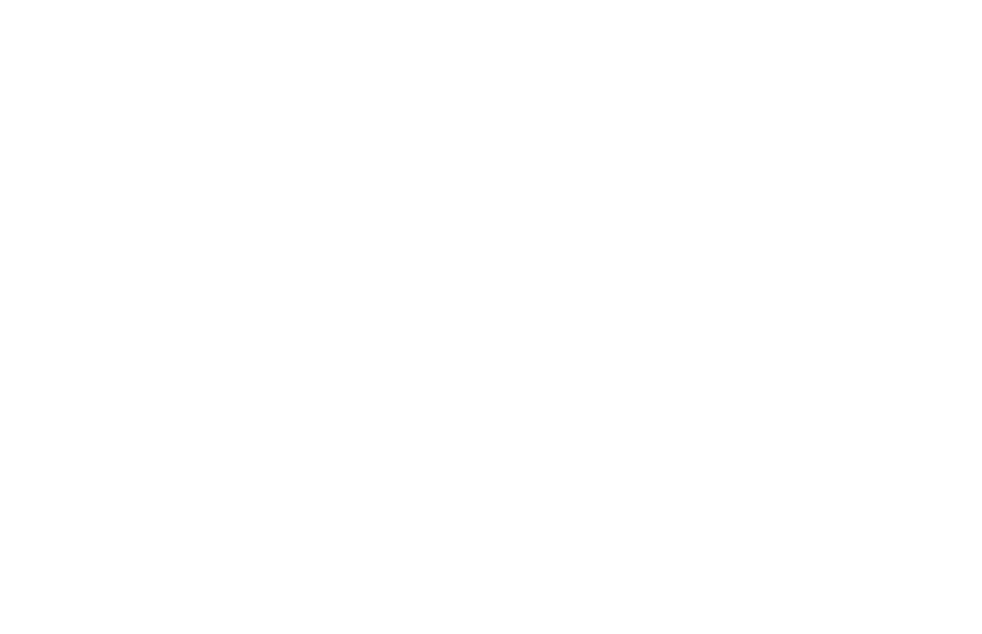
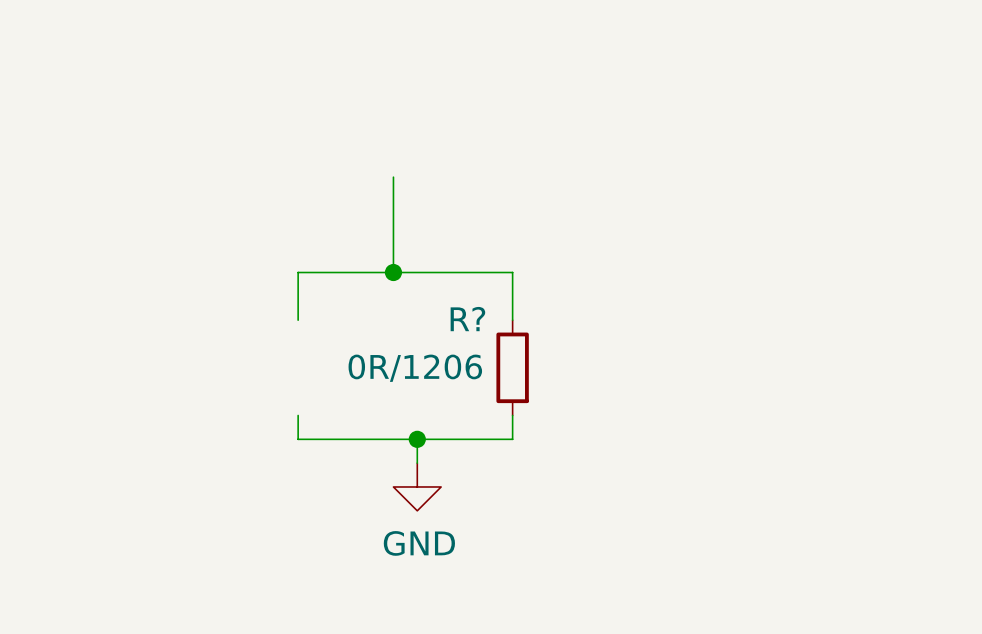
wire: none -> (393, 177) (393, 272)
junction: none -> (393, 272)
wire: none -> (298, 320) (298, 272) (512, 272) (512, 320)
R?: none -> 0R/1206 (512, 367)
wire: none -> (298, 415) (298, 439) (512, 439) (512, 415)
wire: none -> (417, 439) (417, 463)
junction: none -> (417, 439)
power symbol: none -> GND (417, 486)

